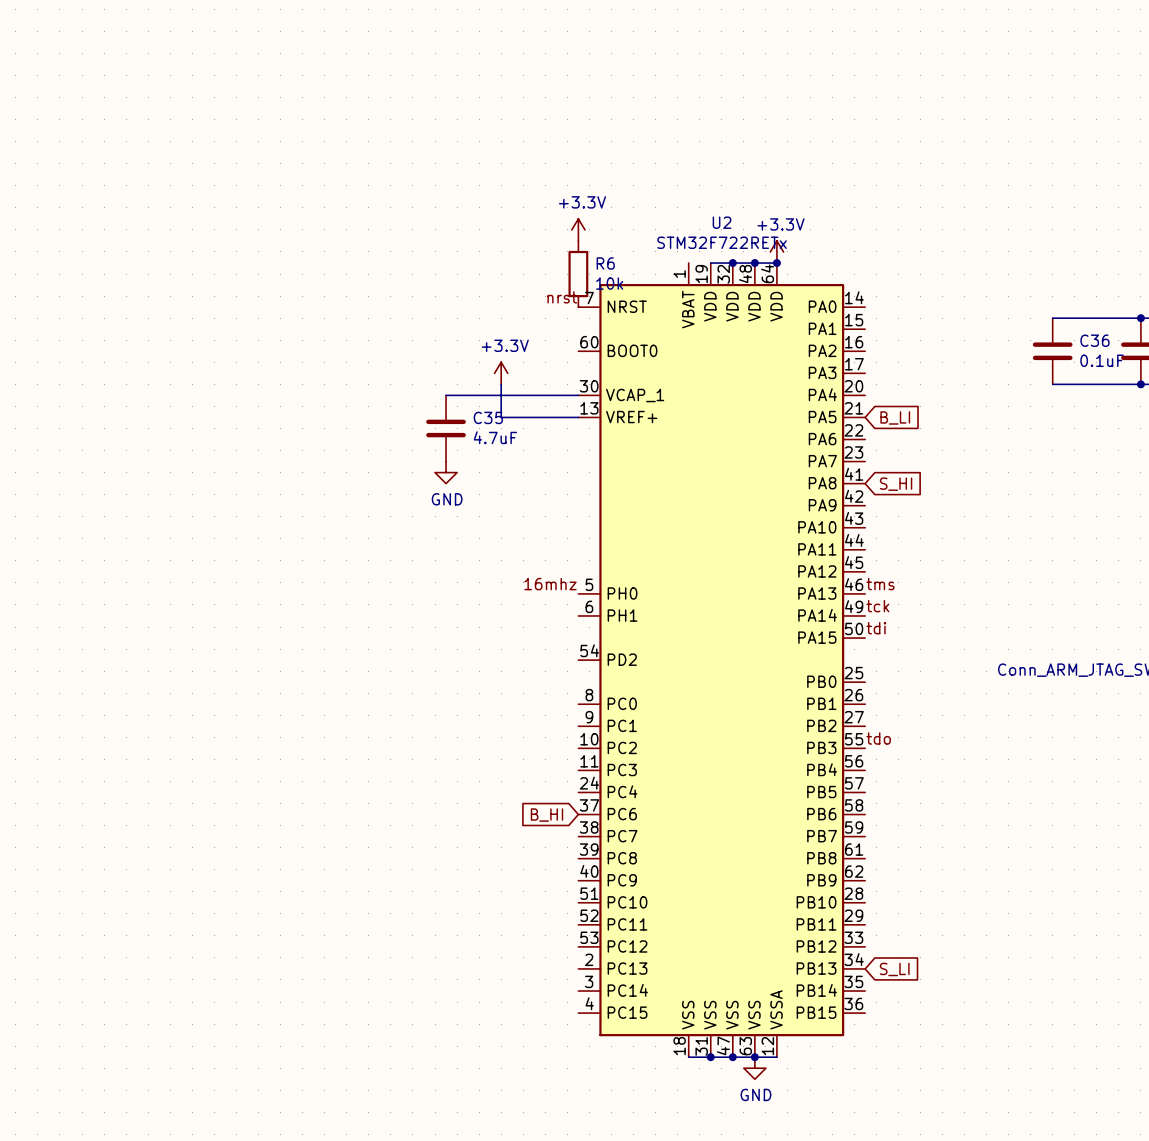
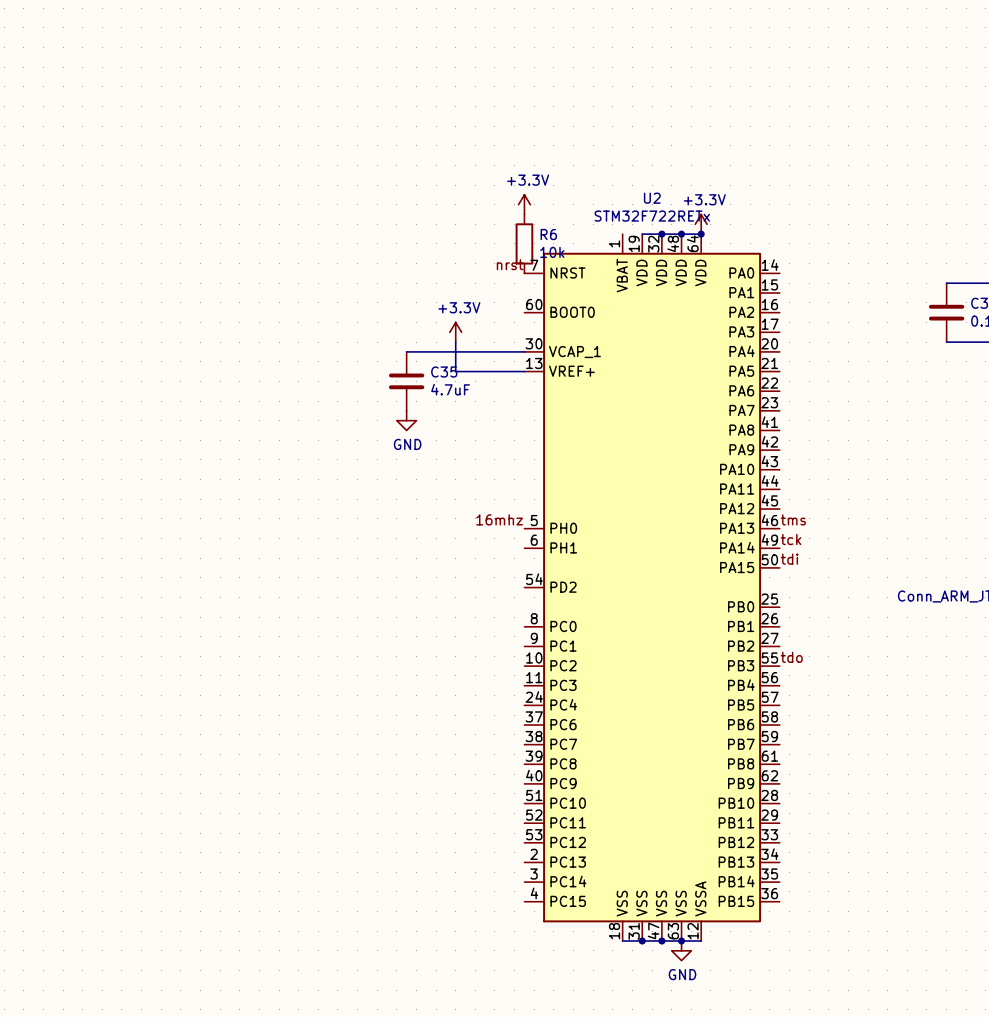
global label: B_LI (895, 417) -> none
global label: S_HI (896, 484) -> none
global label: B_HI (546, 815) -> none
global label: S_LI (894, 969) -> none

